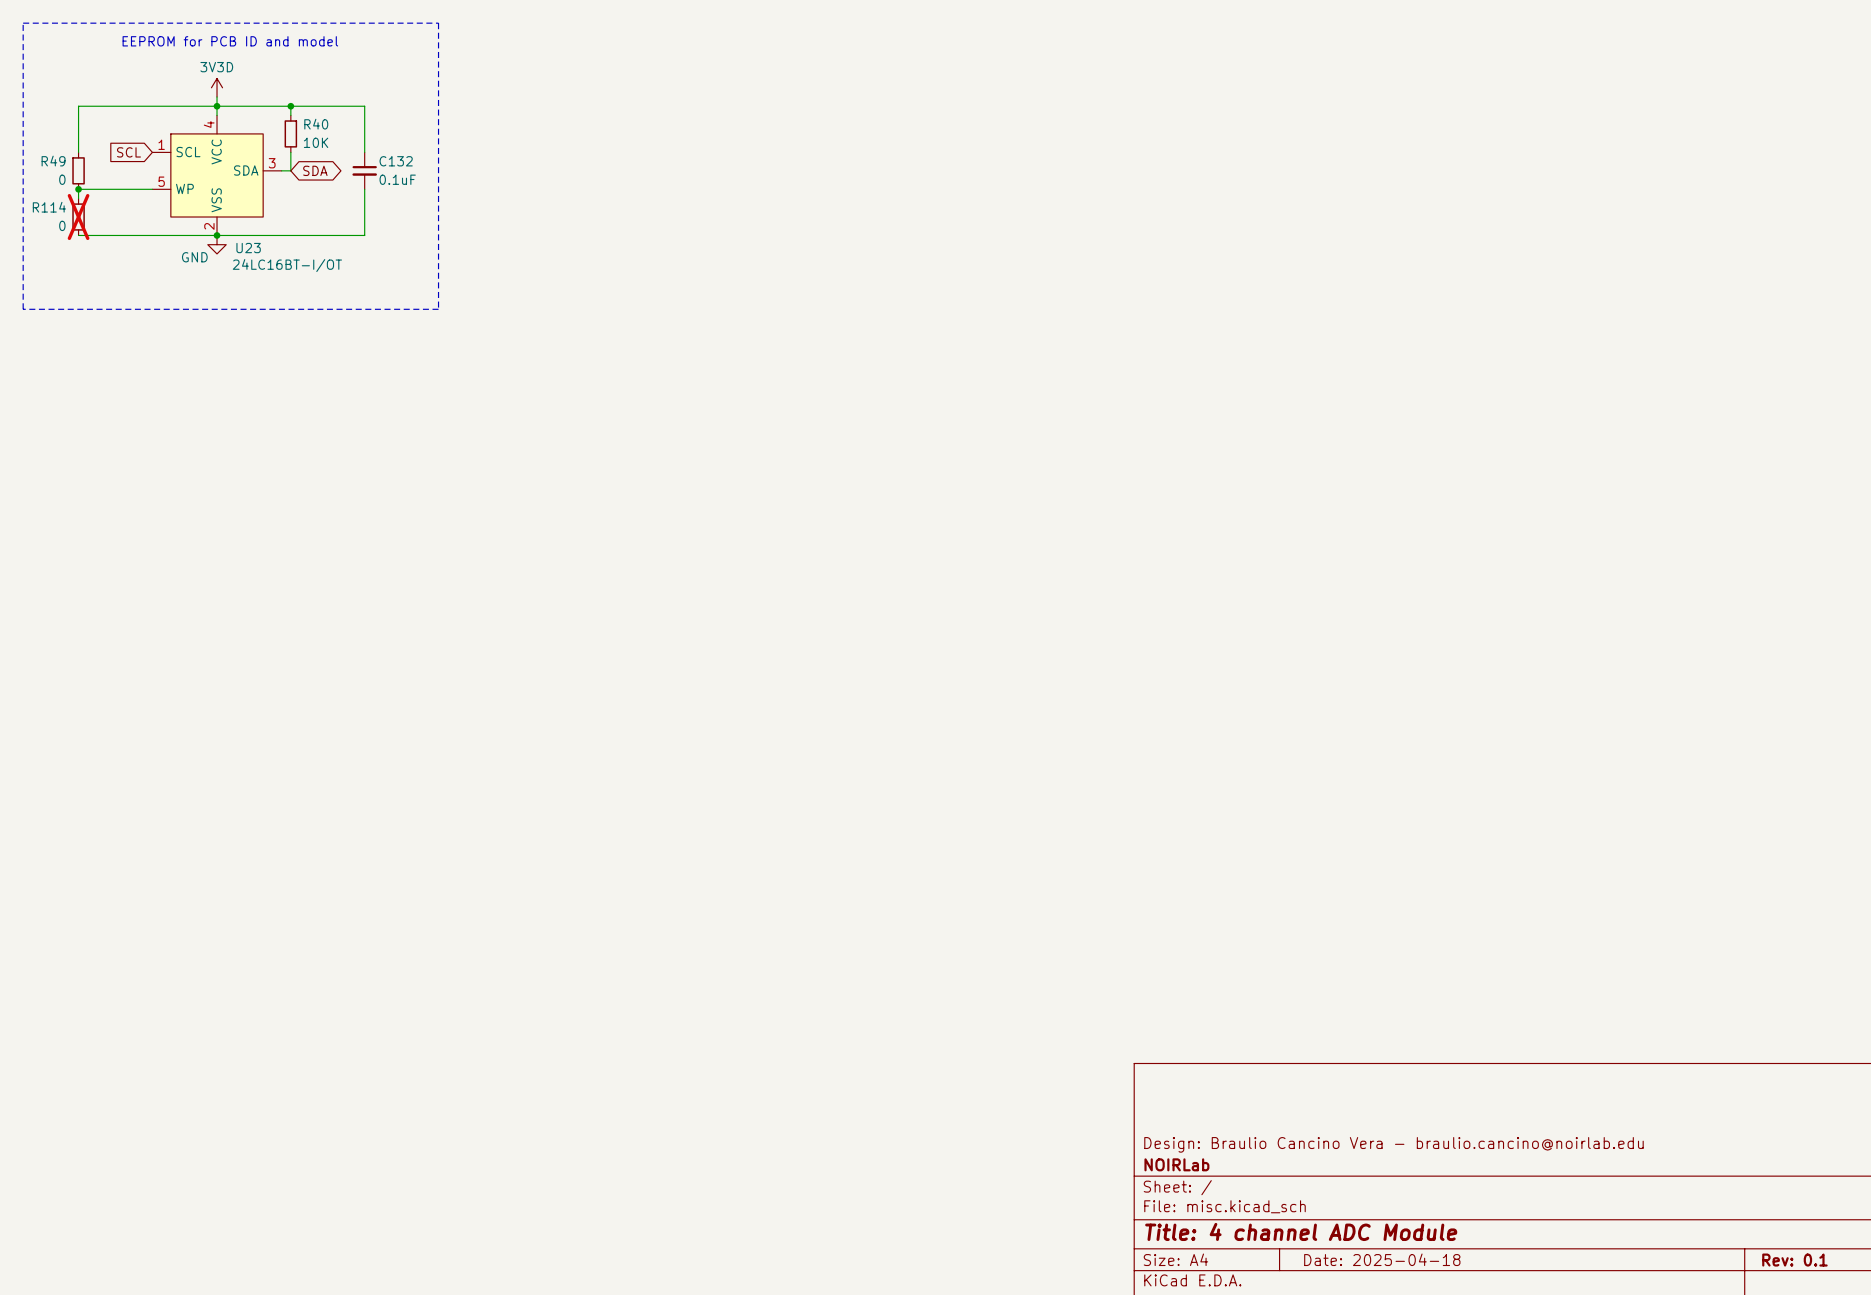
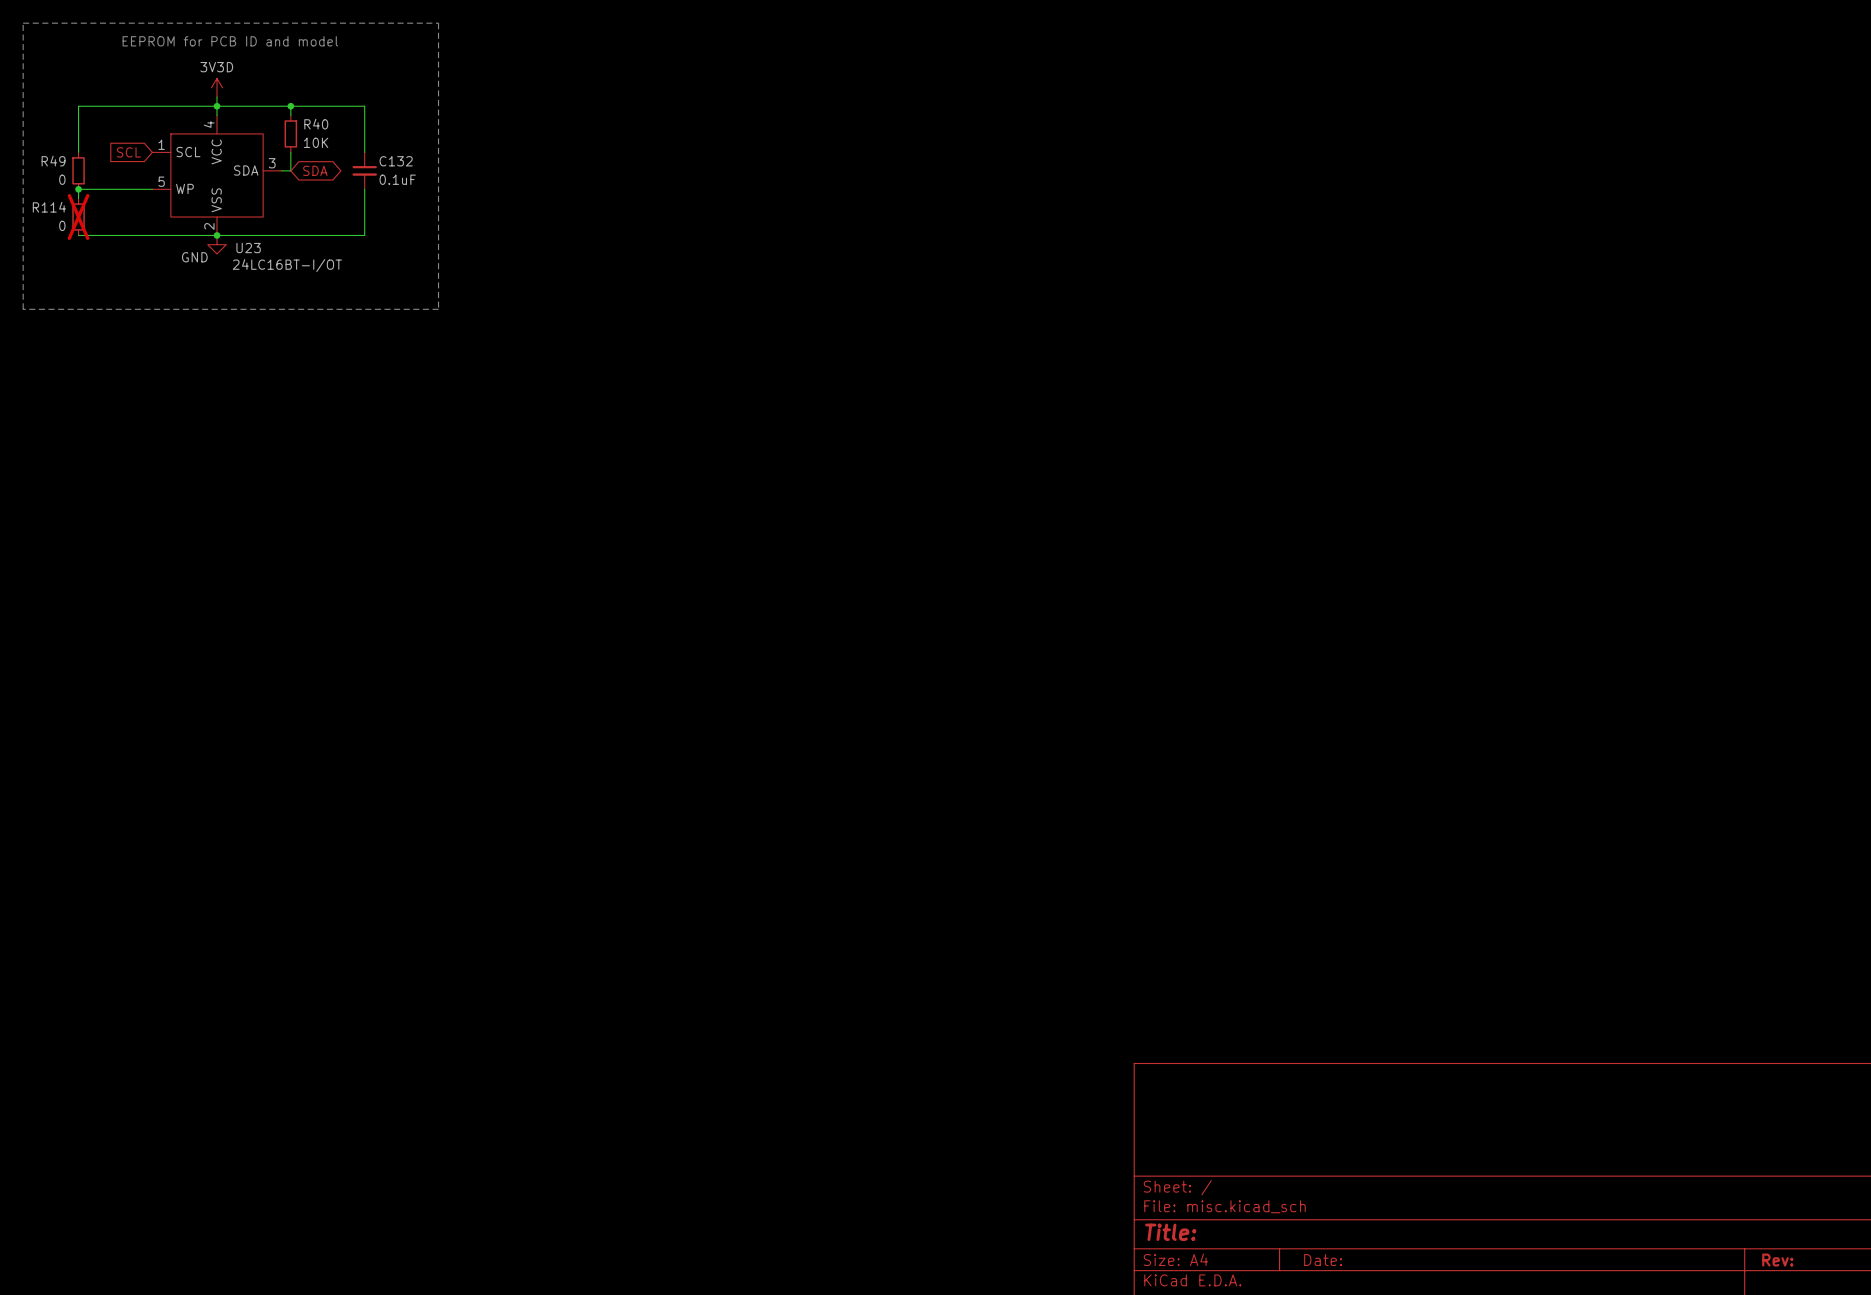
title block: Design: Braulio Cancino Vera - braulio.cancino@noirlab.edu (1393, 1144) -> none
title block: NOIRLab (1176, 1164) -> none
title block: Title: 4 channel ADC Module (1301, 1231) -> Title: (1170, 1232)
title block: Date: 2025-04-18 (1382, 1259) -> Date: (1323, 1260)
title block: Rev: 0.1 (1794, 1260) -> Rev: (1777, 1260)

